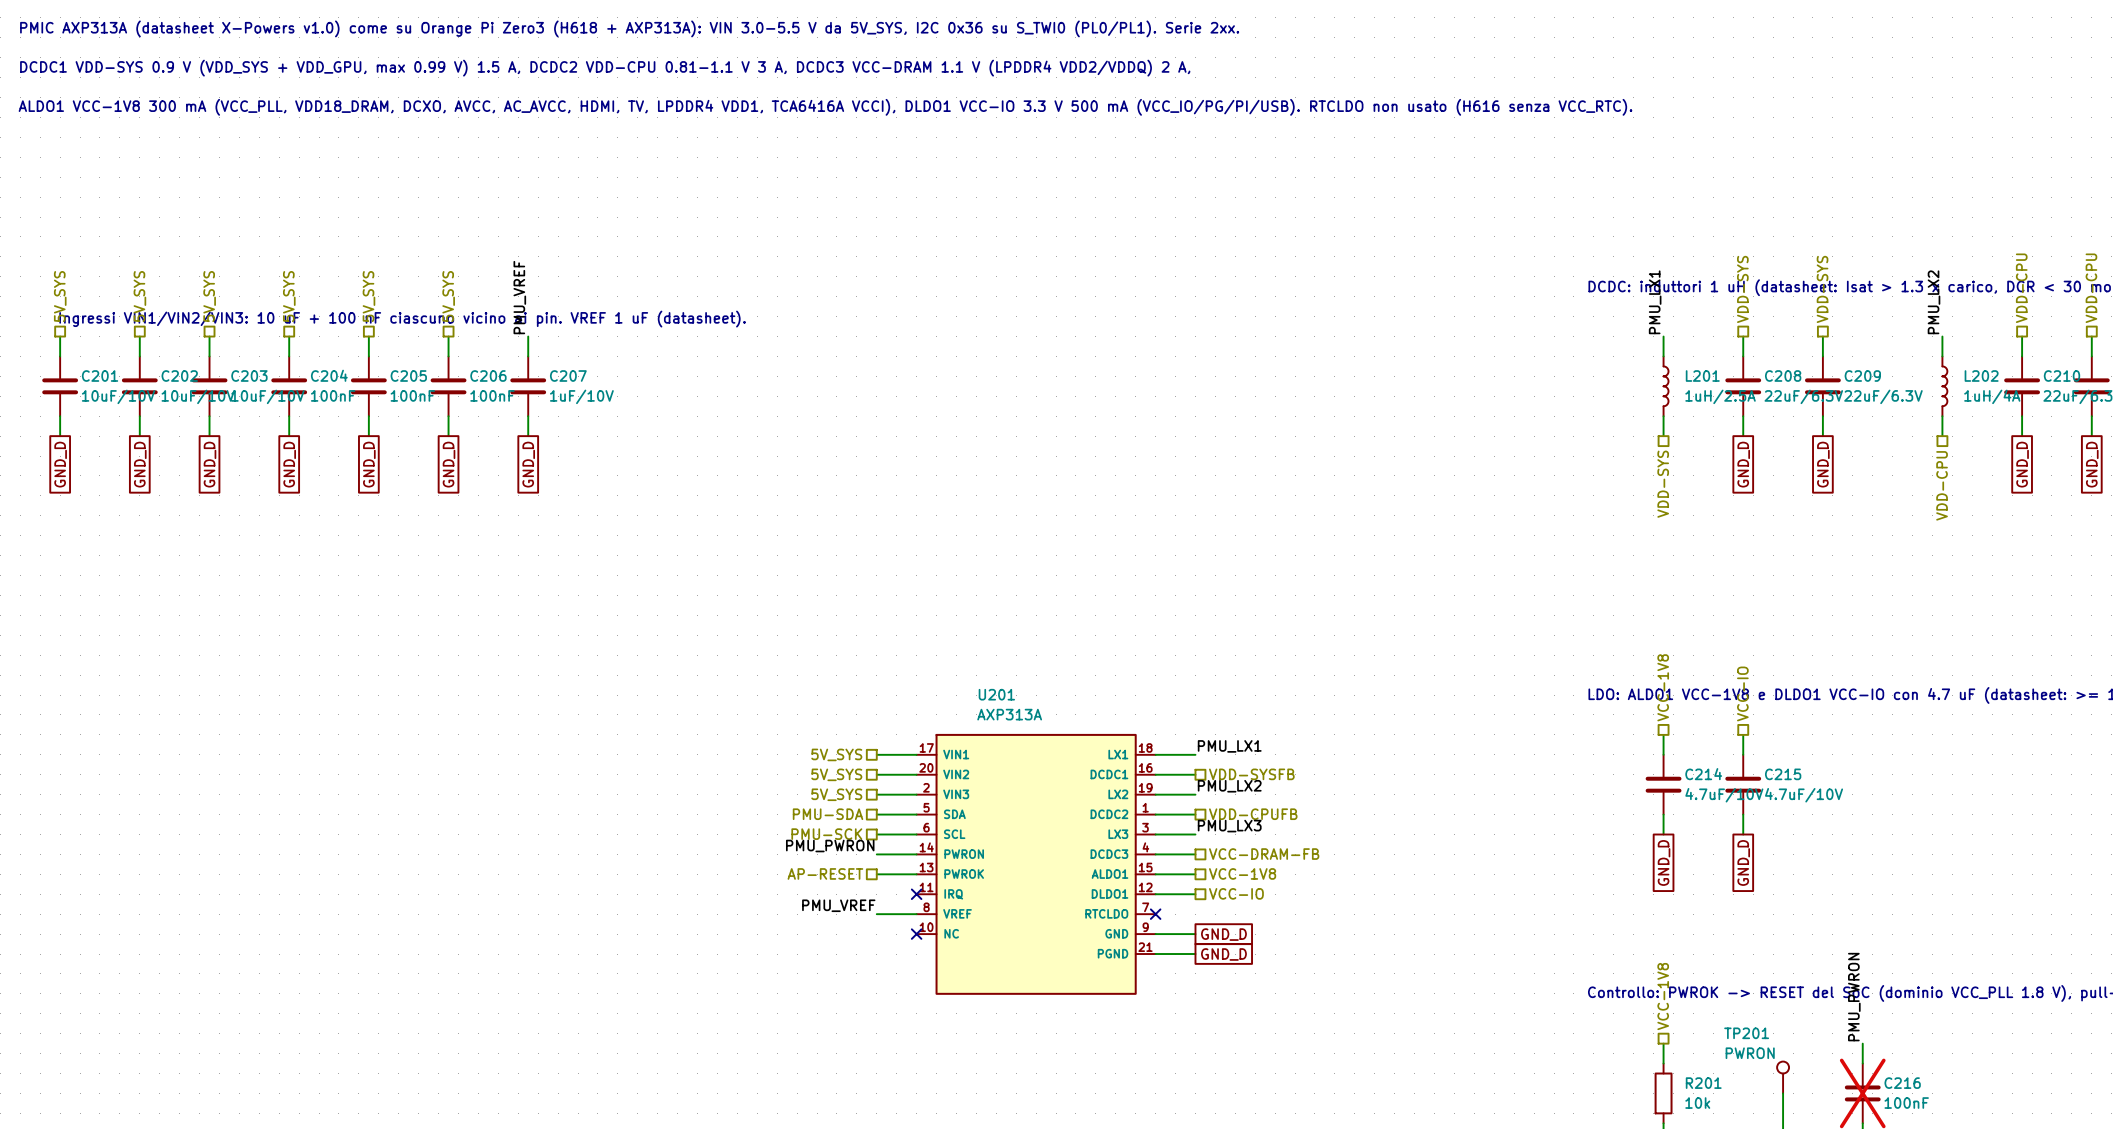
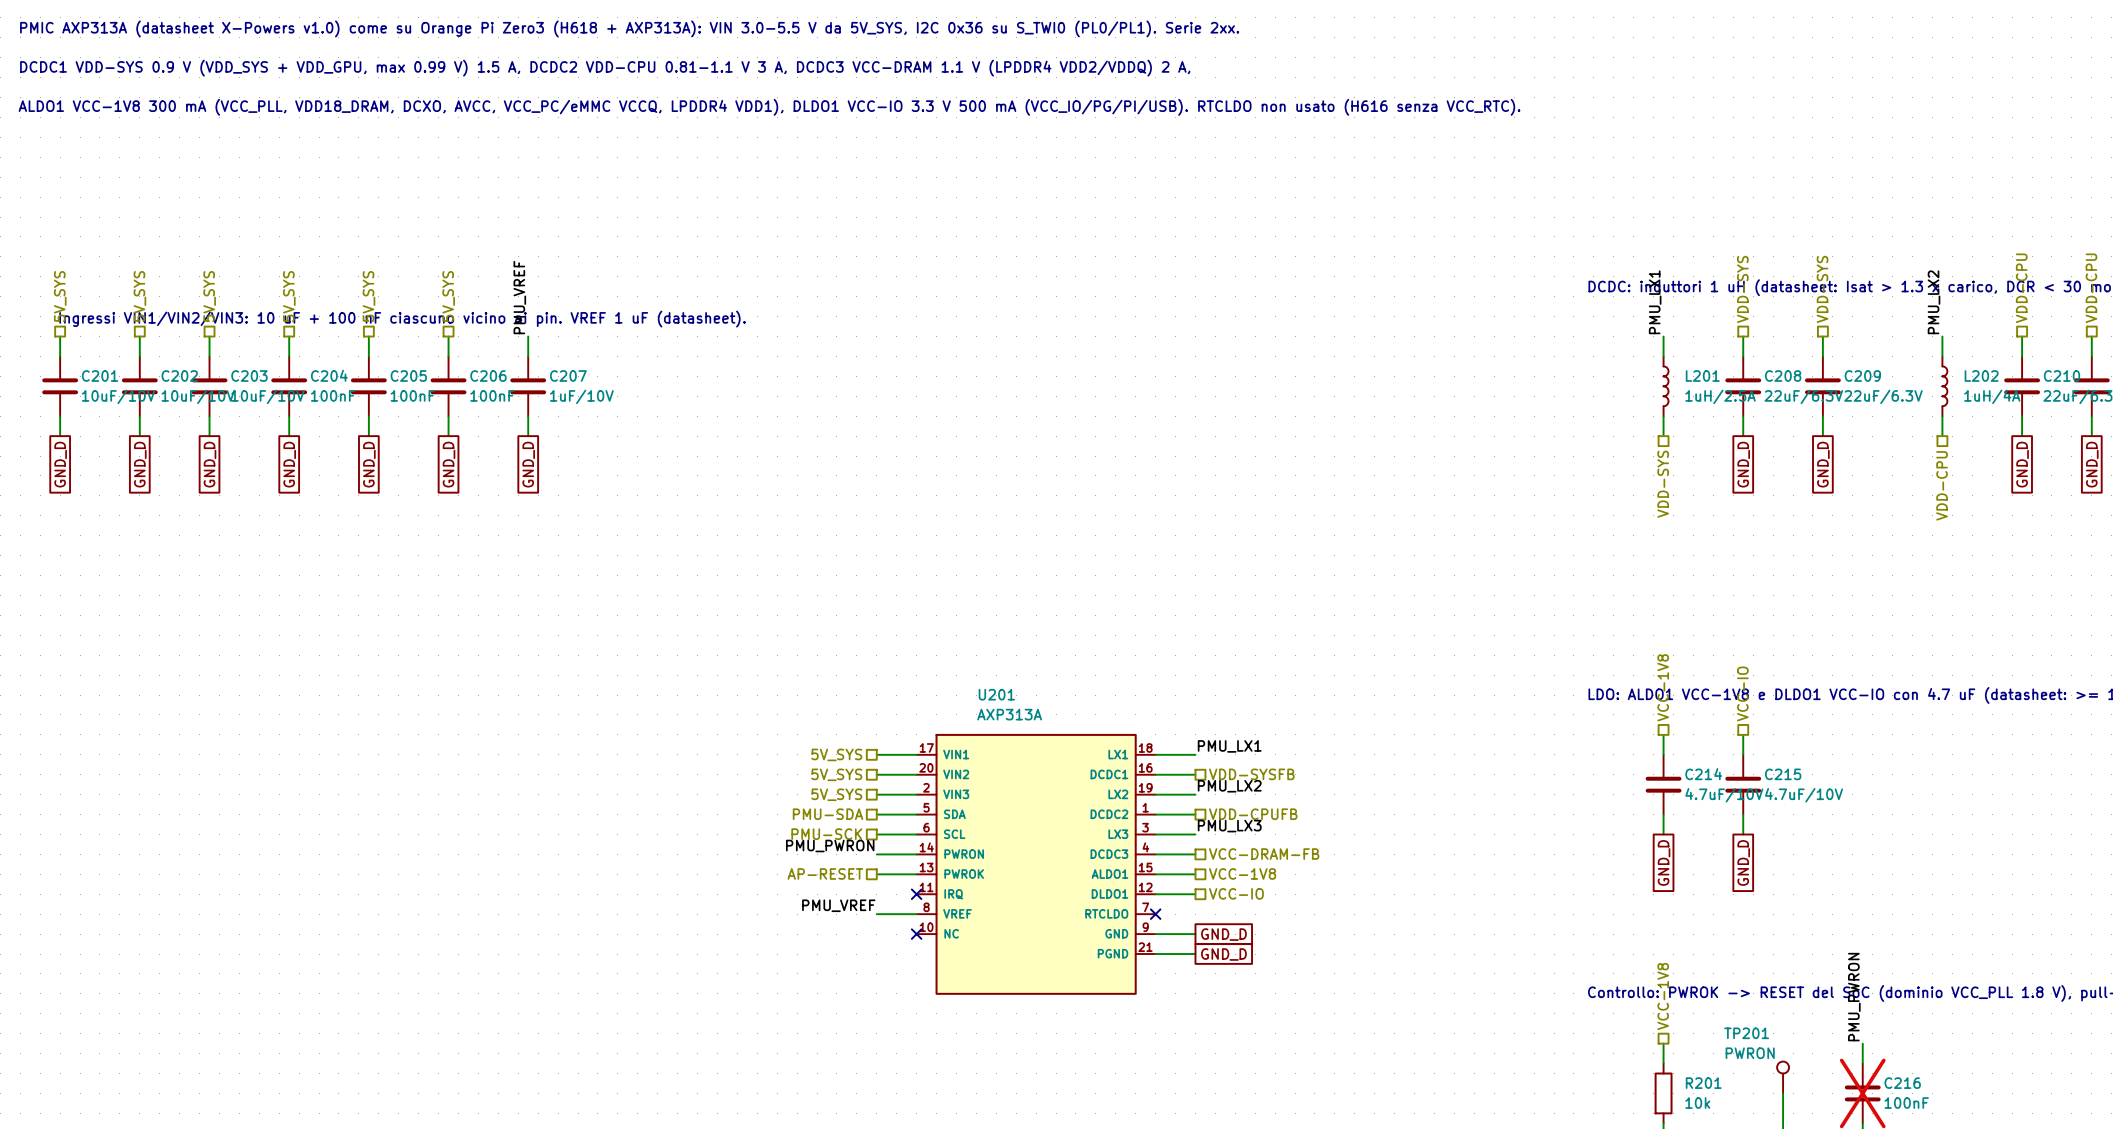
text: ALDO1 VCC-1V8 300 mA (VCC_PLL, VDD18_DRAM, DCXO, AVCC, AC_AVCC, HDMI, TV, LPDDR4 VDD1, TCA6416A VCCI), DLDO1 VCC-IO 3.3 V 500 mA (VCC_IO/PG/PI/USB). RTCLDO non usato (H616 senza VCC_RTC). (825, 107) -> ALDO1 VCC-1V8 300 mA (VCC_PLL, VDD18_DRAM, DCXO, AVCC, VCC_PC/eMMC VCCQ, LPDDR4 VDD1), DLDO1 VCC-IO 3.3 V 500 mA (VCC_IO/PG/PI/USB). RTCLDO non usato (H616 senza VCC_RTC). (769, 107)

